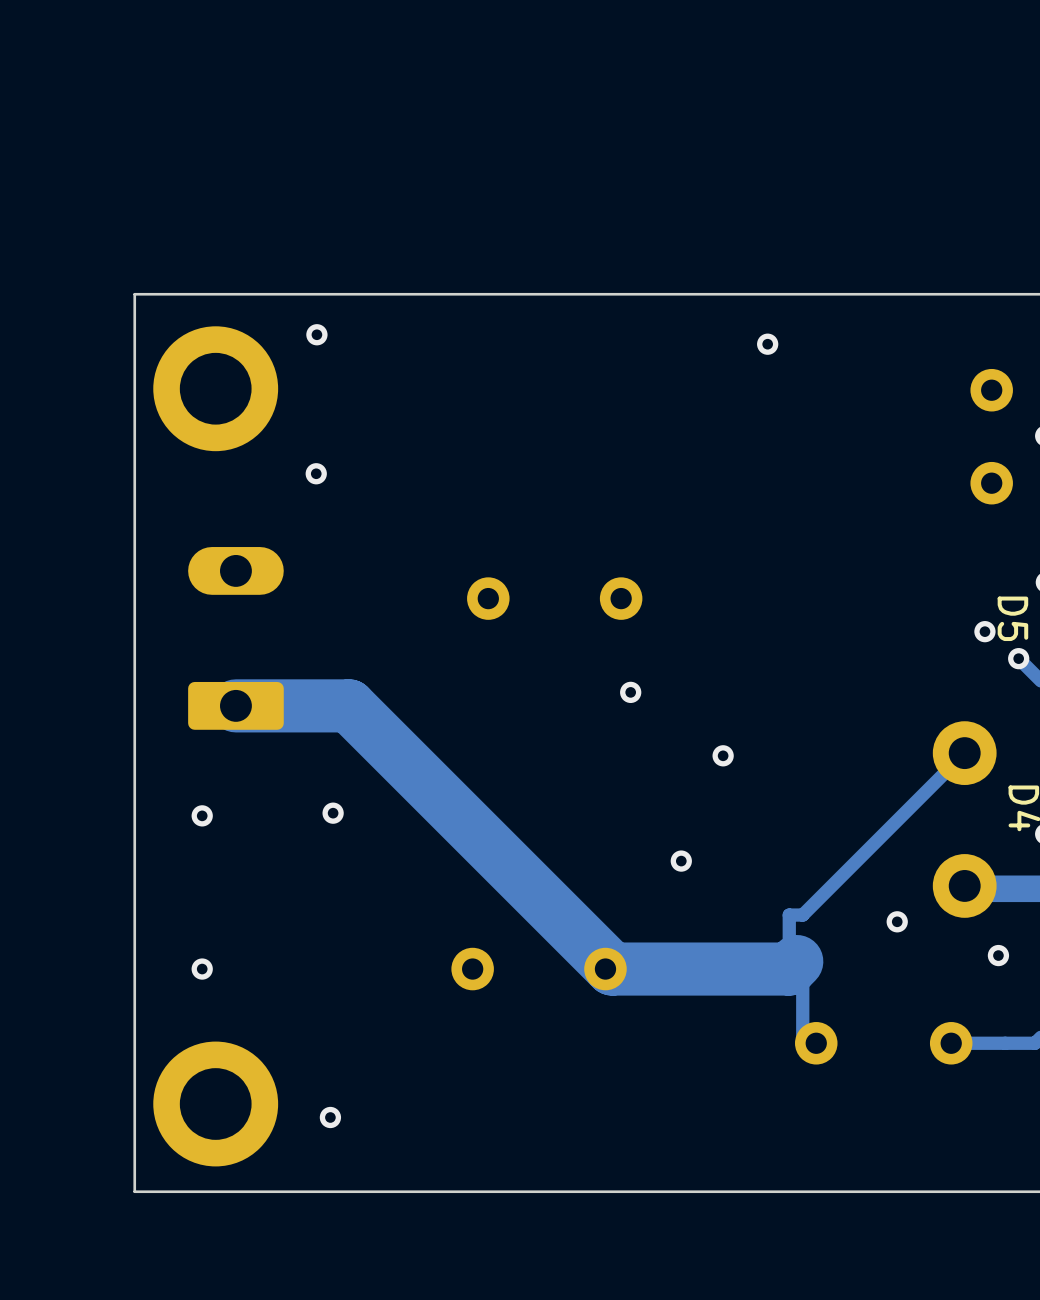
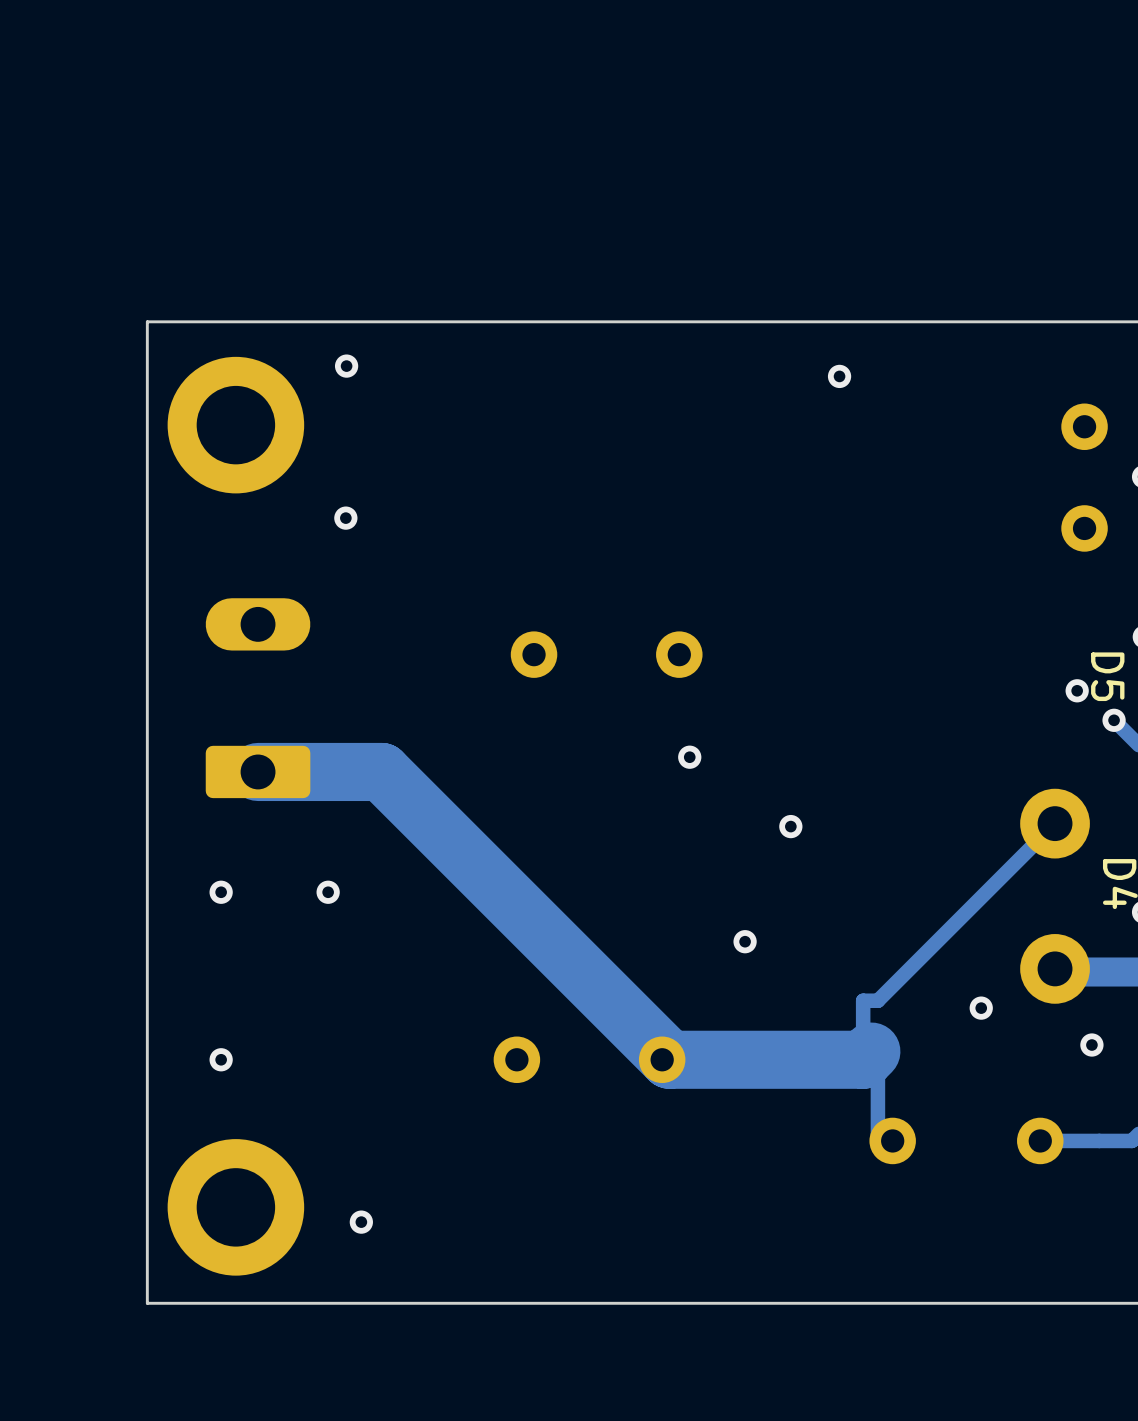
via position: (333, 813) -> (328, 892)

